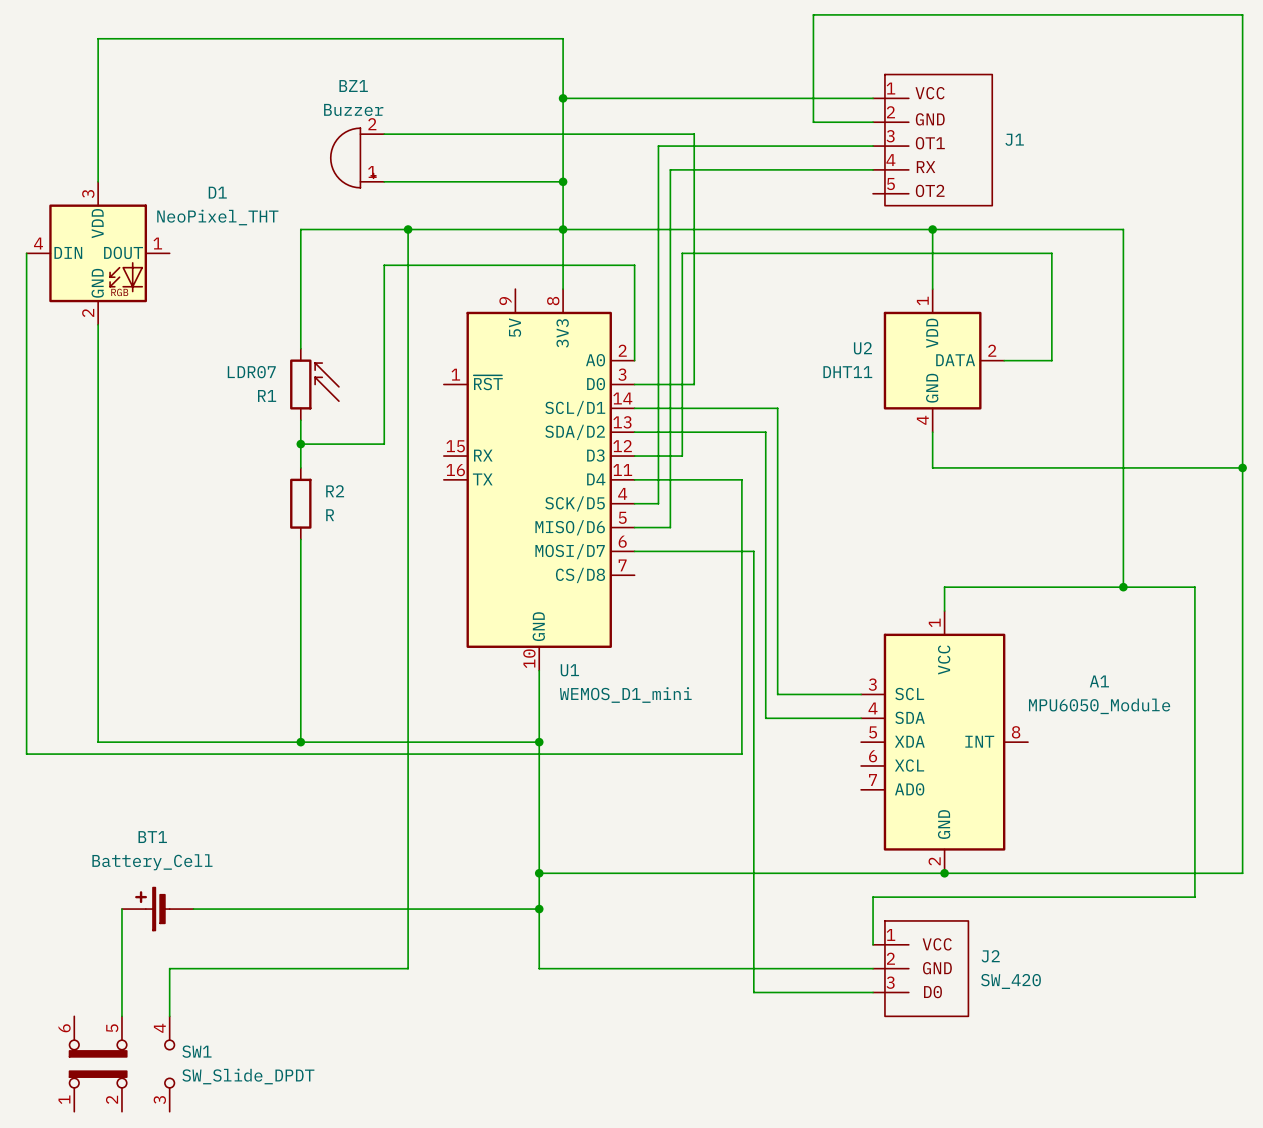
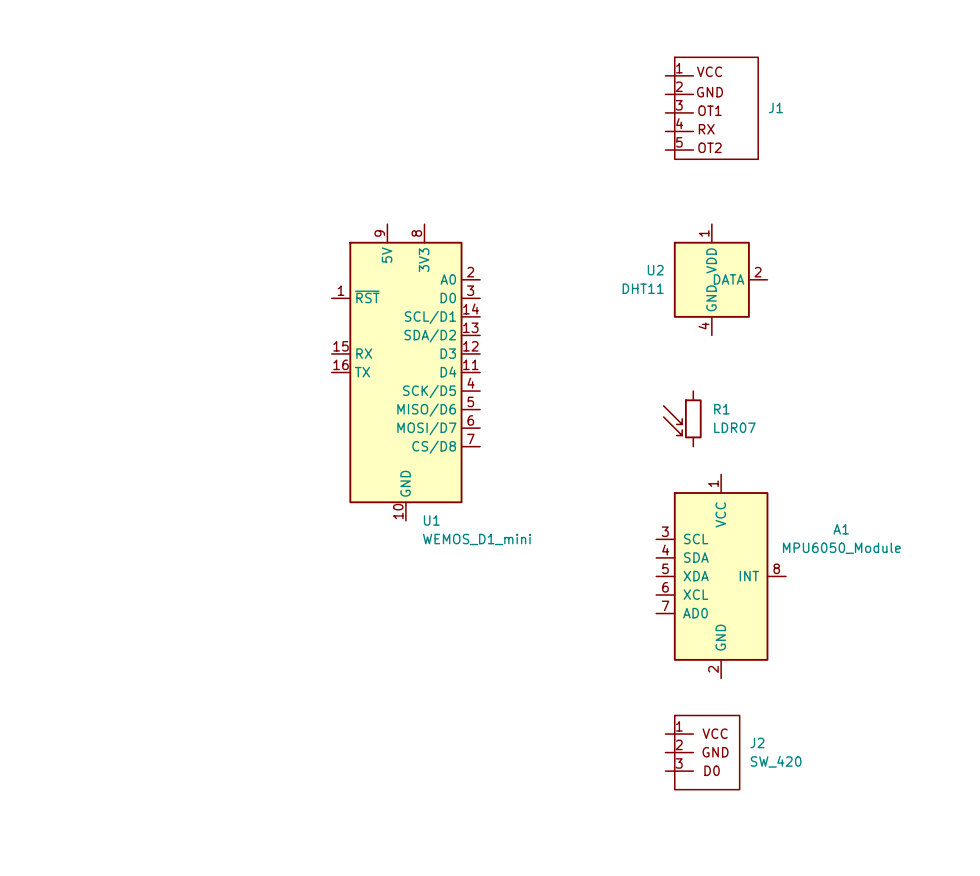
wire: (563, 98) (873, 98) -> none
junction: (563, 98) -> none
wire: (873, 122) (813, 122) (813, 14) (1242, 14) (1242, 873) (539, 873) -> none
wire: (384, 134) (694, 134) (694, 384) (634, 384) -> none
wire: (873, 146) (658, 146) (658, 503) (634, 503) -> none
BZ1: Buzzer (357, 157) -> none
wire: (873, 169) (670, 169) (670, 527) (634, 527) -> none
wire: (98, 181) (98, 38) (563, 38) (563, 289) -> none
wire: (384, 181) (563, 181) -> none
junction: (563, 181) -> none
wire: (408, 229) (408, 968) (169, 968) (169, 1016) -> none
junction: (408, 229) -> none
junction: (563, 229) -> none
wire: (932, 229) (932, 289) -> none
junction: (932, 229) -> none
wire: (26, 253) (26, 754) (741, 754) (741, 479) (634, 479) -> none
D1: NeoPixel_THT (98, 253) -> none
wire: (98, 324) (98, 742) (539, 742) -> none
wire: (300, 348) (300, 229) (1123, 229) (1123, 587) -> none
wire: (634, 360) (634, 265) (384, 265) (384, 444) (300, 444) -> none
wire: (1004, 360) (1051, 360) (1051, 253) (682, 253) (682, 456) (634, 456) -> none
R1 rotation: 0° (314, 384) -> 180° (682, 418)
R1 position: (314, 384) -> (682, 418)
wire: (634, 408) (777, 408) (777, 694) (861, 694) -> none
wire: (300, 420) (300, 467) -> none
wire: (634, 432) (765, 432) (765, 718) (861, 718) -> none
wire: (932, 432) (932, 467) (1242, 467) -> none
junction: (300, 444) -> none
junction: (1242, 467) -> none
R2: R (300, 503) -> none
wire: (300, 539) (300, 742) -> none
wire: (634, 551) (753, 551) (753, 992) (873, 992) -> none
junction: (1123, 587) -> none
wire: (944, 611) (944, 587) (1194, 587) (1194, 897) (873, 897) (873, 944) -> none
wire: (539, 670) (539, 968) (873, 968) -> none
junction: (300, 742) -> none
junction: (539, 742) -> none
junction: (539, 873) -> none
junction: (944, 873) -> none
wire: (121, 909) (121, 1016) -> none
BT1: Battery_Cell (157, 909) -> none
wire: (193, 909) (539, 909) -> none
junction: (539, 909) -> none
SW1: SW_Slide_DPDT (121, 1064) -> none

